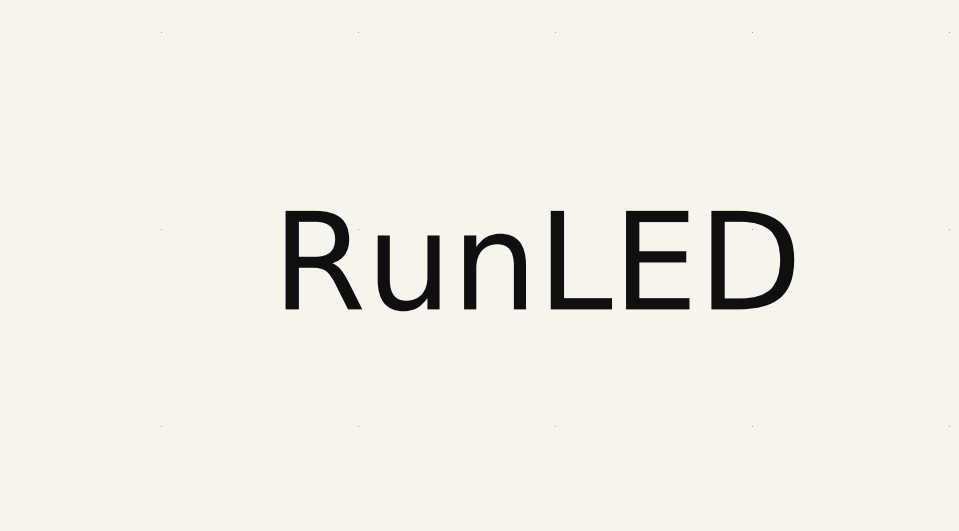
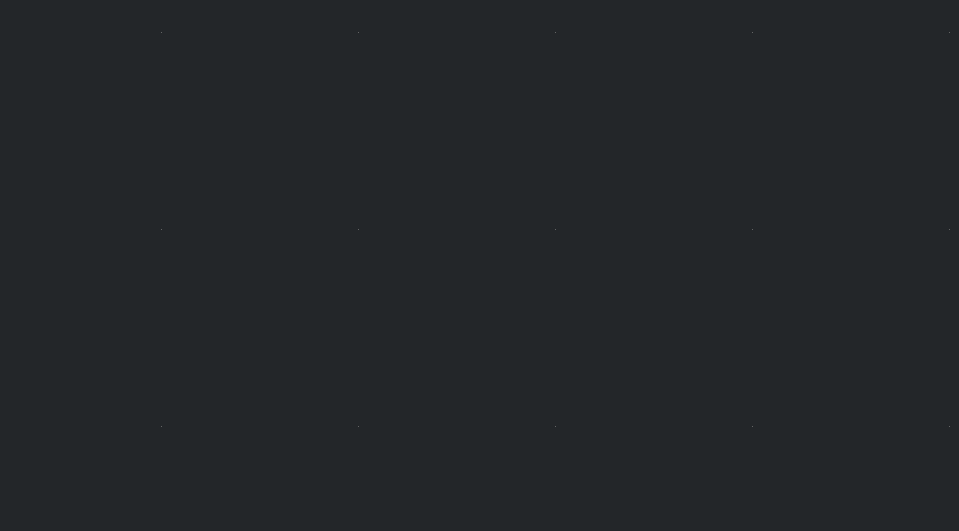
label: RunLED (539, 261) -> none

